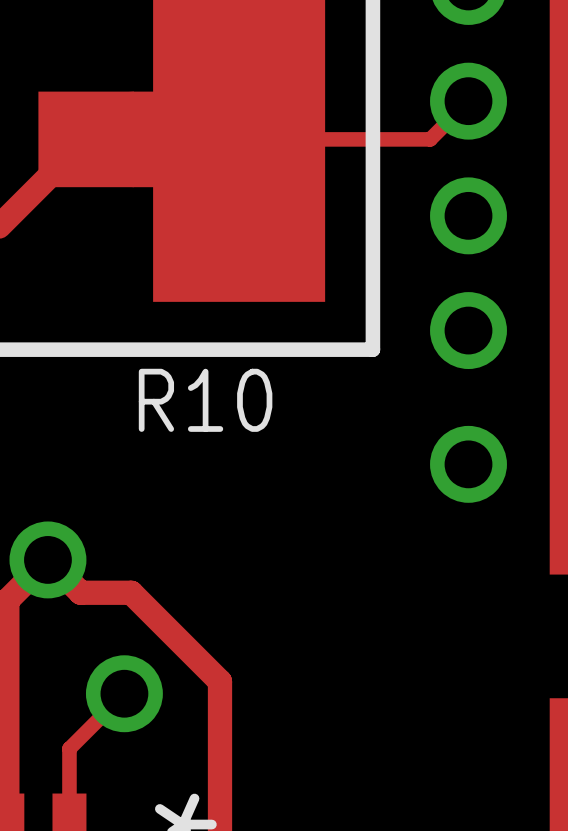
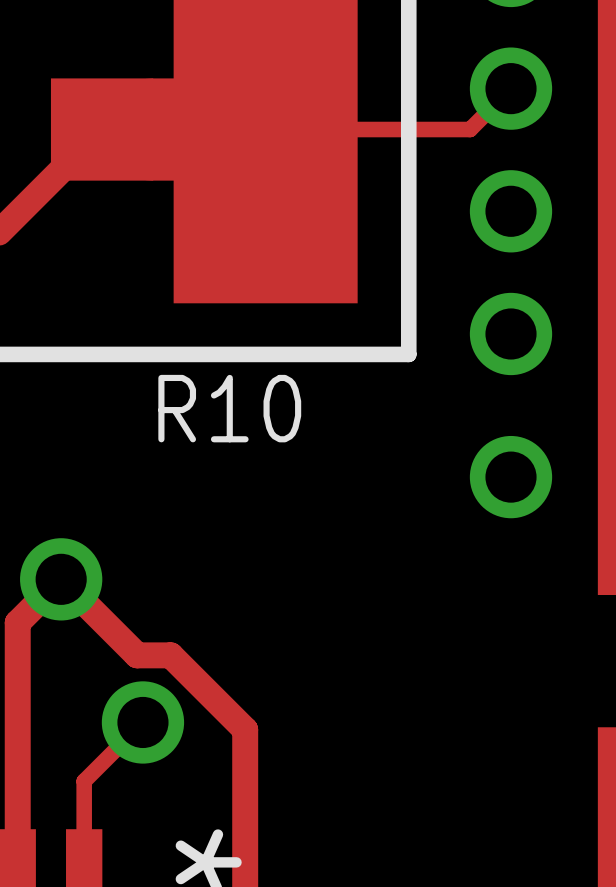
track: (80, 592) (131, 592) (220, 681) (220, 700) -> (96, 614) (137, 655) (170, 655) (245, 729)

